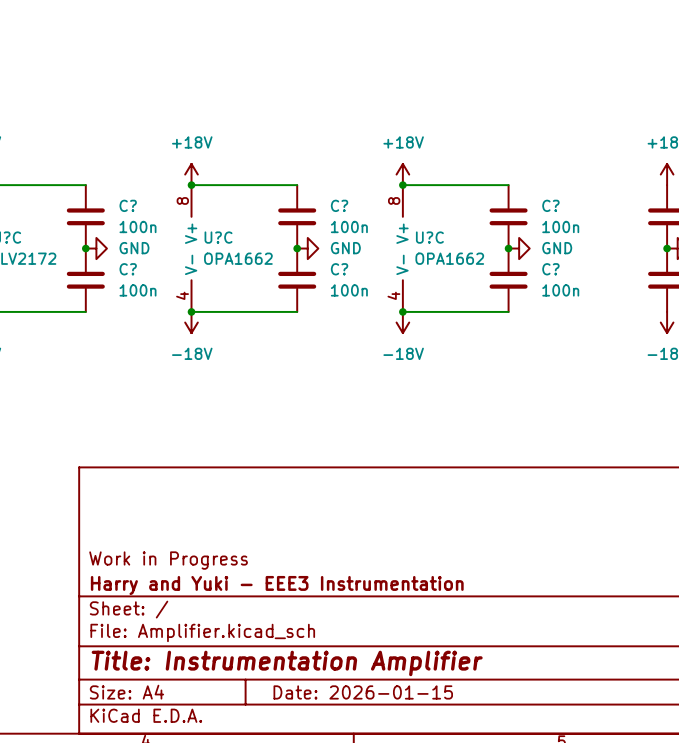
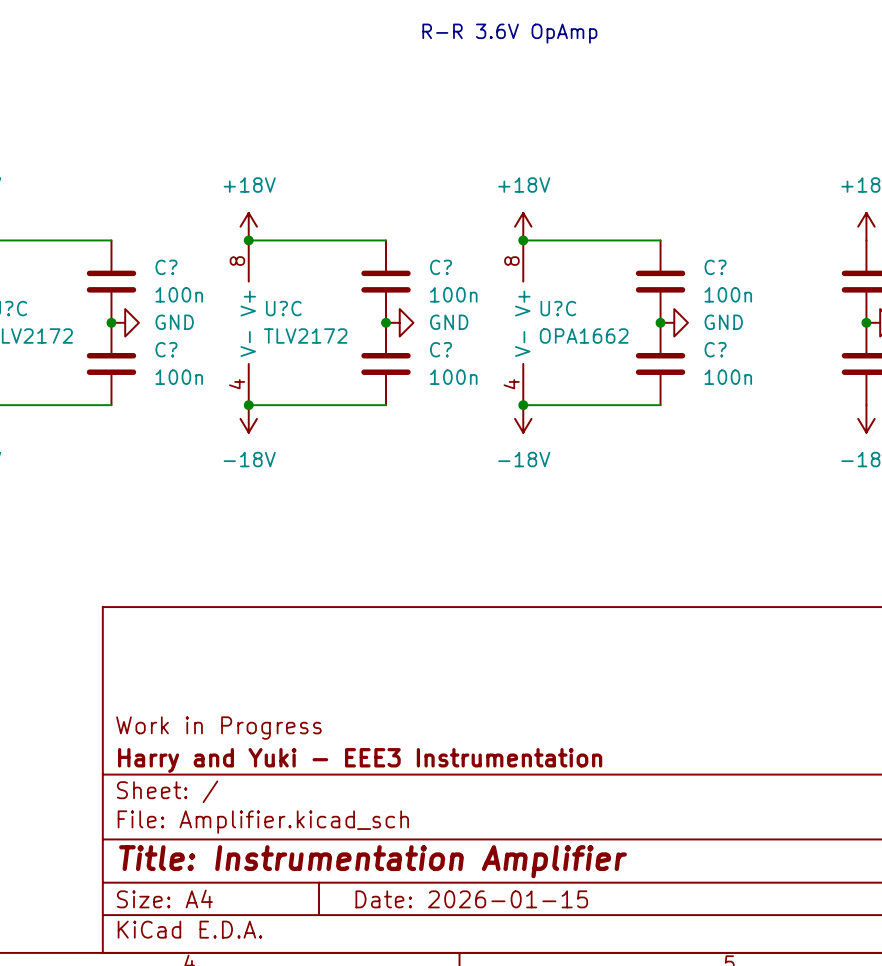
text: none -> R-R 3.6V OpAmp (509, 33)
U?C value: OPA1662 (238, 258) -> TLV2172 (305, 336)

